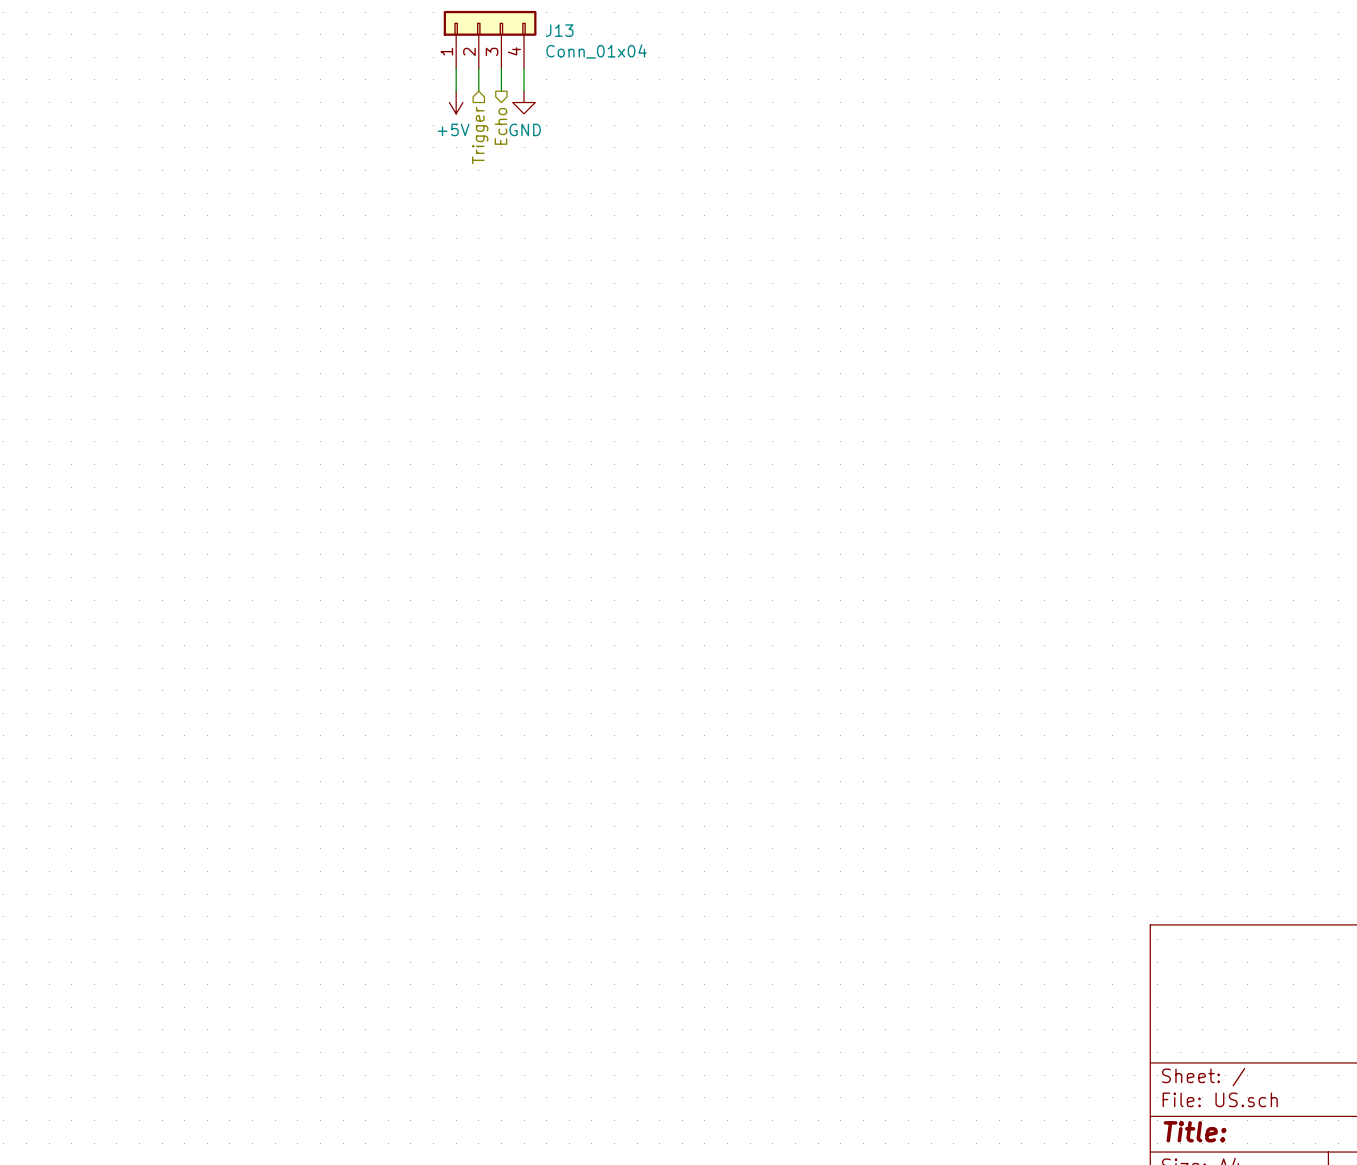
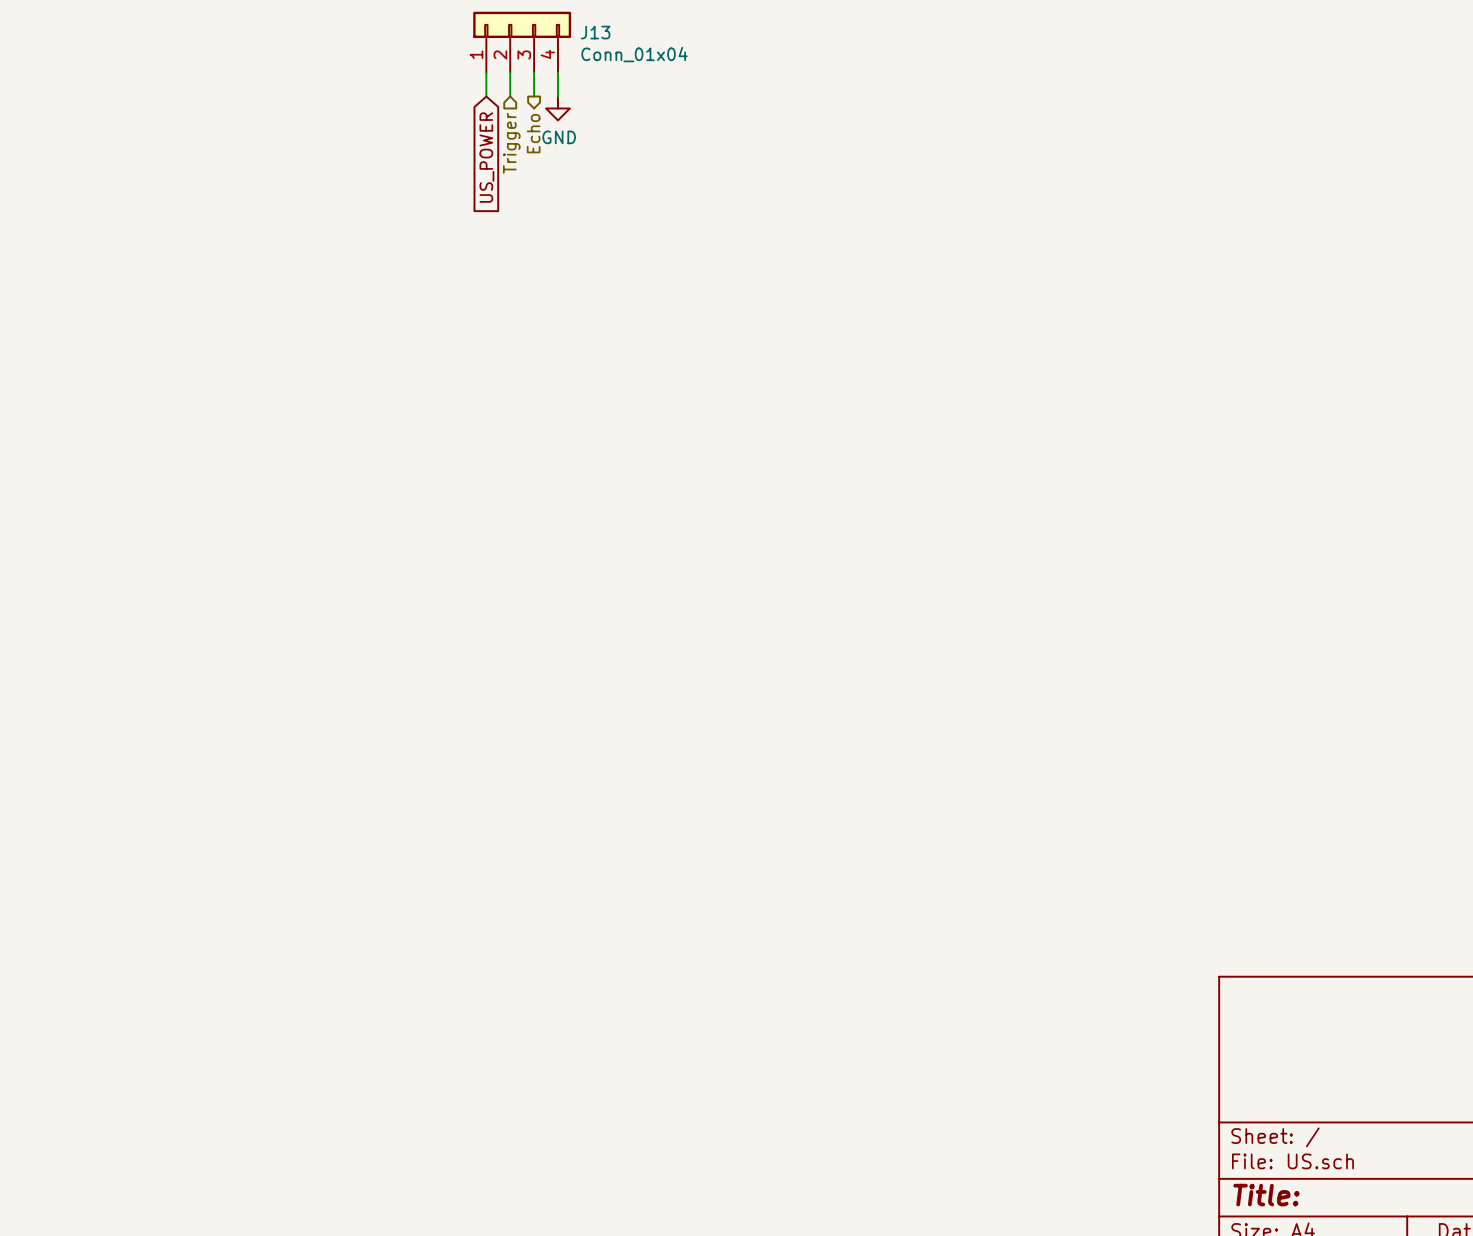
power symbol: +5V (456, 102) -> none
global label: none -> US_POWER (486, 157)

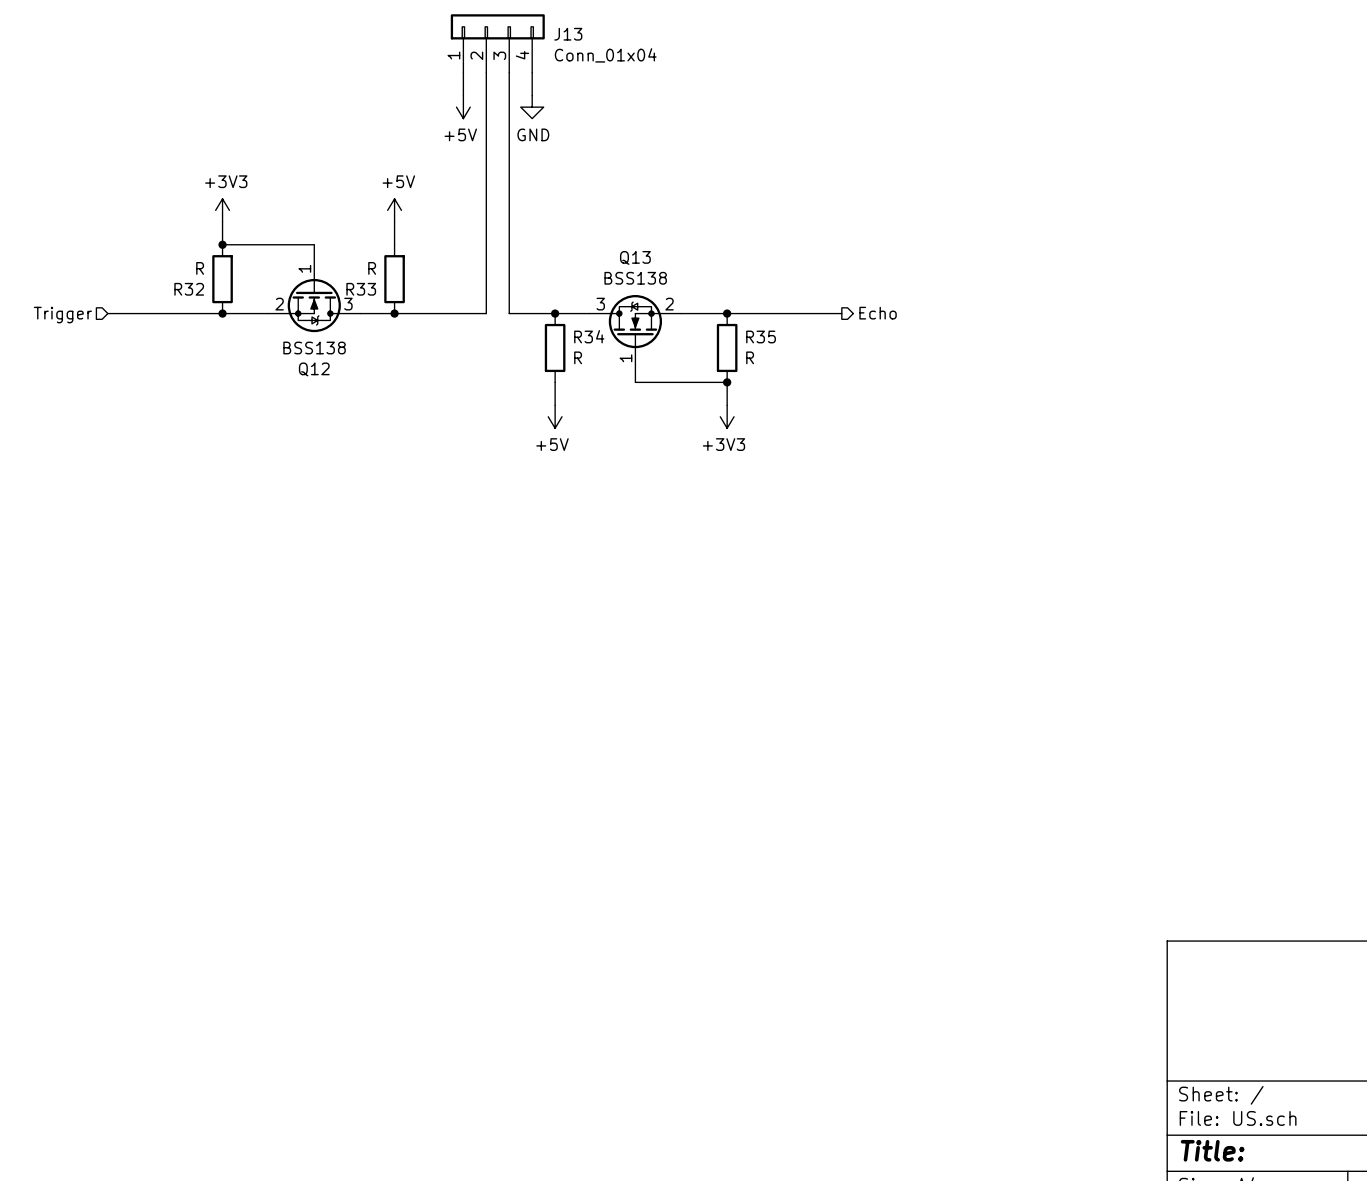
wire: none -> (486, 95) (486, 313) (360, 313)
wire: none -> (509, 95) (509, 313) (589, 313)
power symbol: none -> +5V (463, 107)
hierarchical label: Echo (533, 133) -> none
hierarchical label: Trigger (511, 143) -> none
global label: US_POWER (486, 157) -> none
power symbol: none -> +3V3 (222, 210)
power symbol: none -> +5V (394, 210)
wire: none -> (222, 221) (222, 244) (314, 244)
wire: none -> (394, 221) (394, 244)
junction: none -> (222, 244)
R32: none -> R (222, 279)
R33: none -> R (394, 279)
Q12: none -> BSS138 (314, 288)
hierarchical label: none -> Echo (878, 313)
wire: none -> (107, 313) (268, 313)
junction: none -> (222, 313)
junction: none -> (394, 313)
junction: none -> (555, 313)
wire: none -> (681, 313) (841, 313)
junction: none -> (727, 313)
hierarchical label: none -> Trigger (62, 315)
Q13: none -> BSS138 (635, 338)
R34: none -> R (555, 347)
R35: none -> R (727, 347)
wire: none -> (555, 382) (555, 405)
wire: none -> (635, 382) (727, 382) (727, 405)
junction: none -> (727, 382)
power symbol: none -> +5V (555, 416)
power symbol: none -> +3V3 (727, 416)

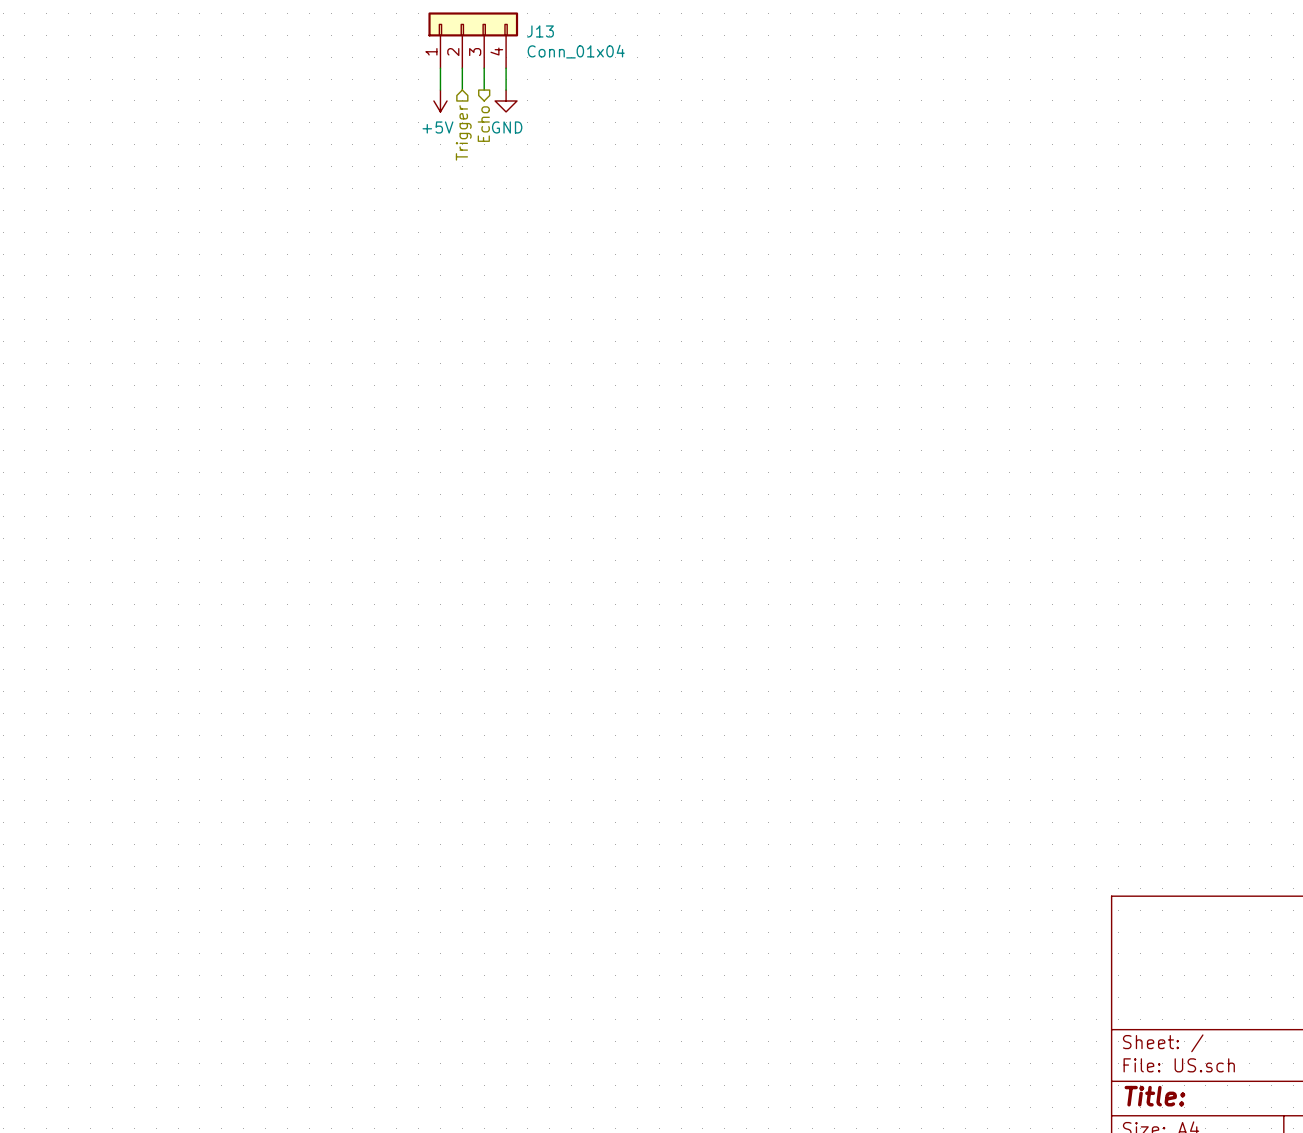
wire: (486, 95) (486, 313) (360, 313) -> none
wire: (509, 95) (509, 313) (589, 313) -> none
hierarchical label: none -> Echo (483, 124)
hierarchical label: none -> Trigger (463, 132)
power symbol: +3V3 (222, 210) -> none
power symbol: +5V (394, 210) -> none
wire: (222, 221) (222, 244) (314, 244) -> none
wire: (394, 221) (394, 244) -> none
junction: (222, 244) -> none
R32: R (222, 279) -> none
R33: R (394, 279) -> none
Q12: BSS138 (314, 288) -> none
wire: (107, 313) (268, 313) -> none
junction: (222, 313) -> none
junction: (394, 313) -> none
junction: (555, 313) -> none
wire: (681, 313) (841, 313) -> none
junction: (727, 313) -> none
hierarchical label: Echo (878, 313) -> none
hierarchical label: Trigger (62, 315) -> none
Q13: BSS138 (635, 338) -> none
R34: R (555, 347) -> none
R35: R (727, 347) -> none
wire: (555, 382) (555, 405) -> none
wire: (635, 382) (727, 382) (727, 405) -> none
junction: (727, 382) -> none
power symbol: +5V (555, 416) -> none
power symbol: +3V3 (727, 416) -> none

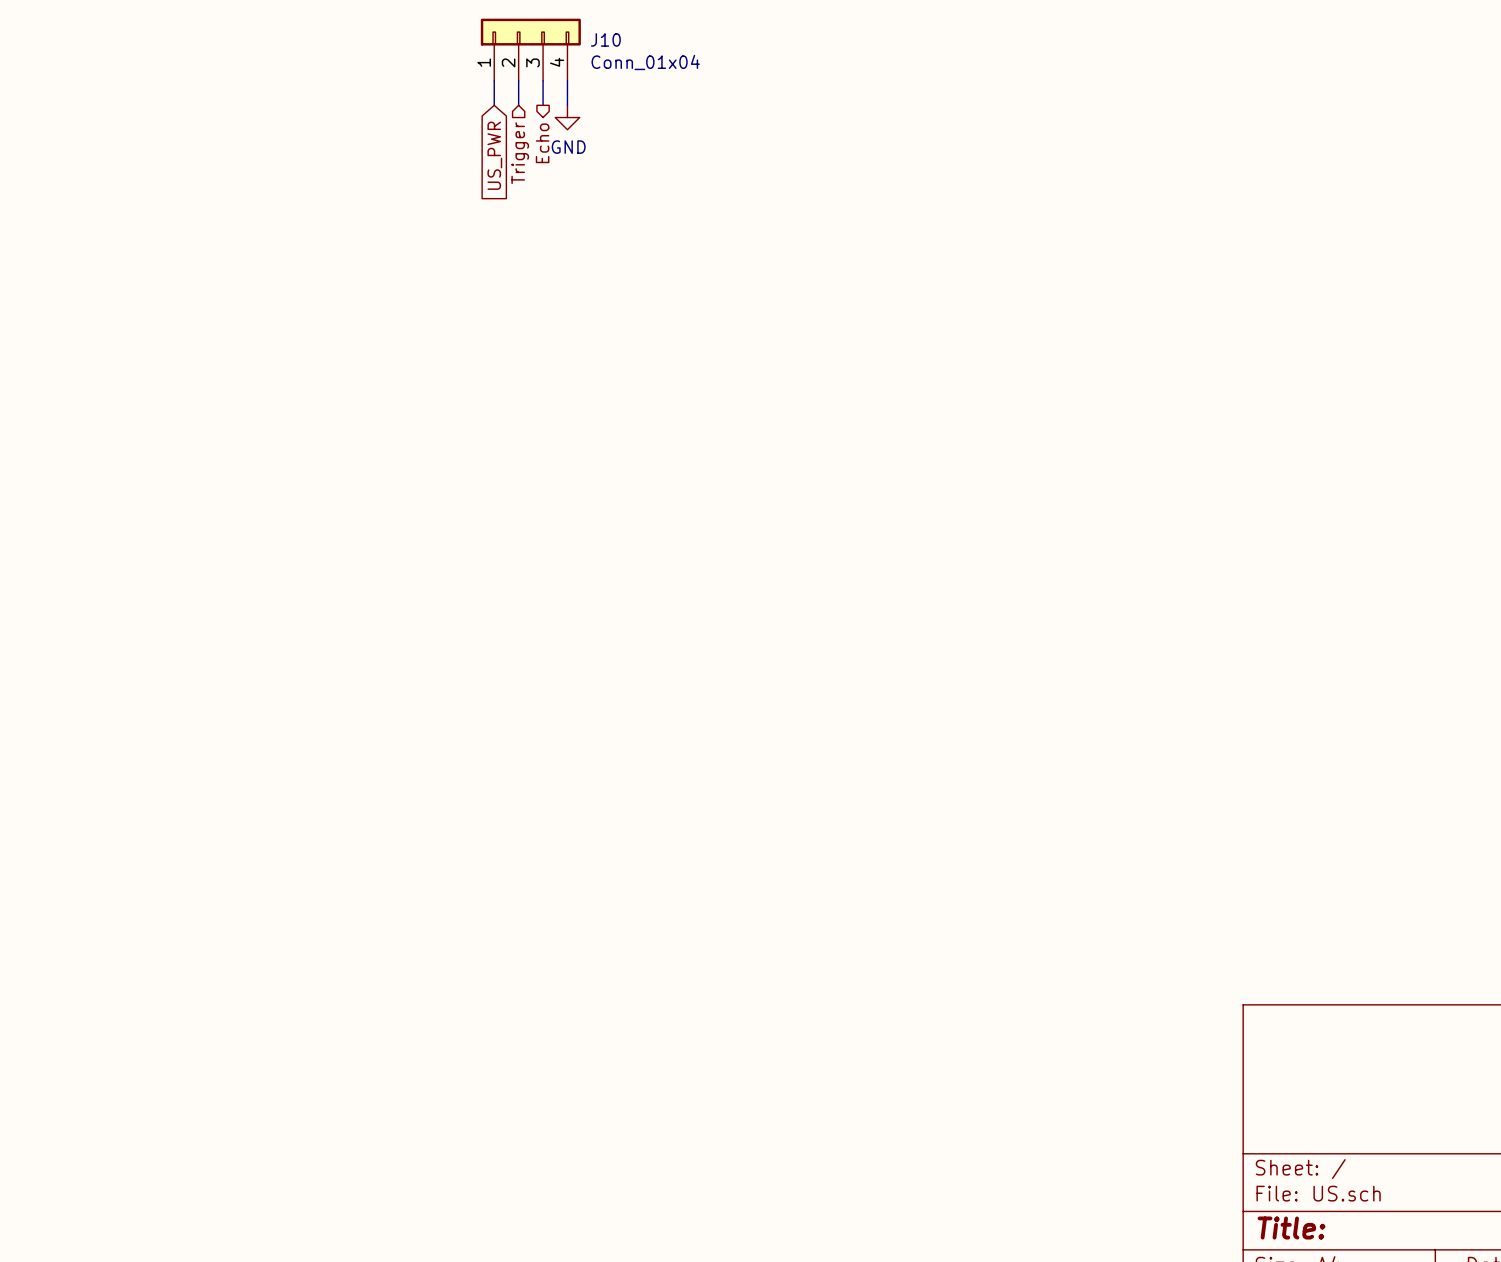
J13 name: J13 (540, 31) -> J10 (605, 39)
power symbol: +5V (440, 100) -> none
global label: none -> US_PWR (494, 155)

